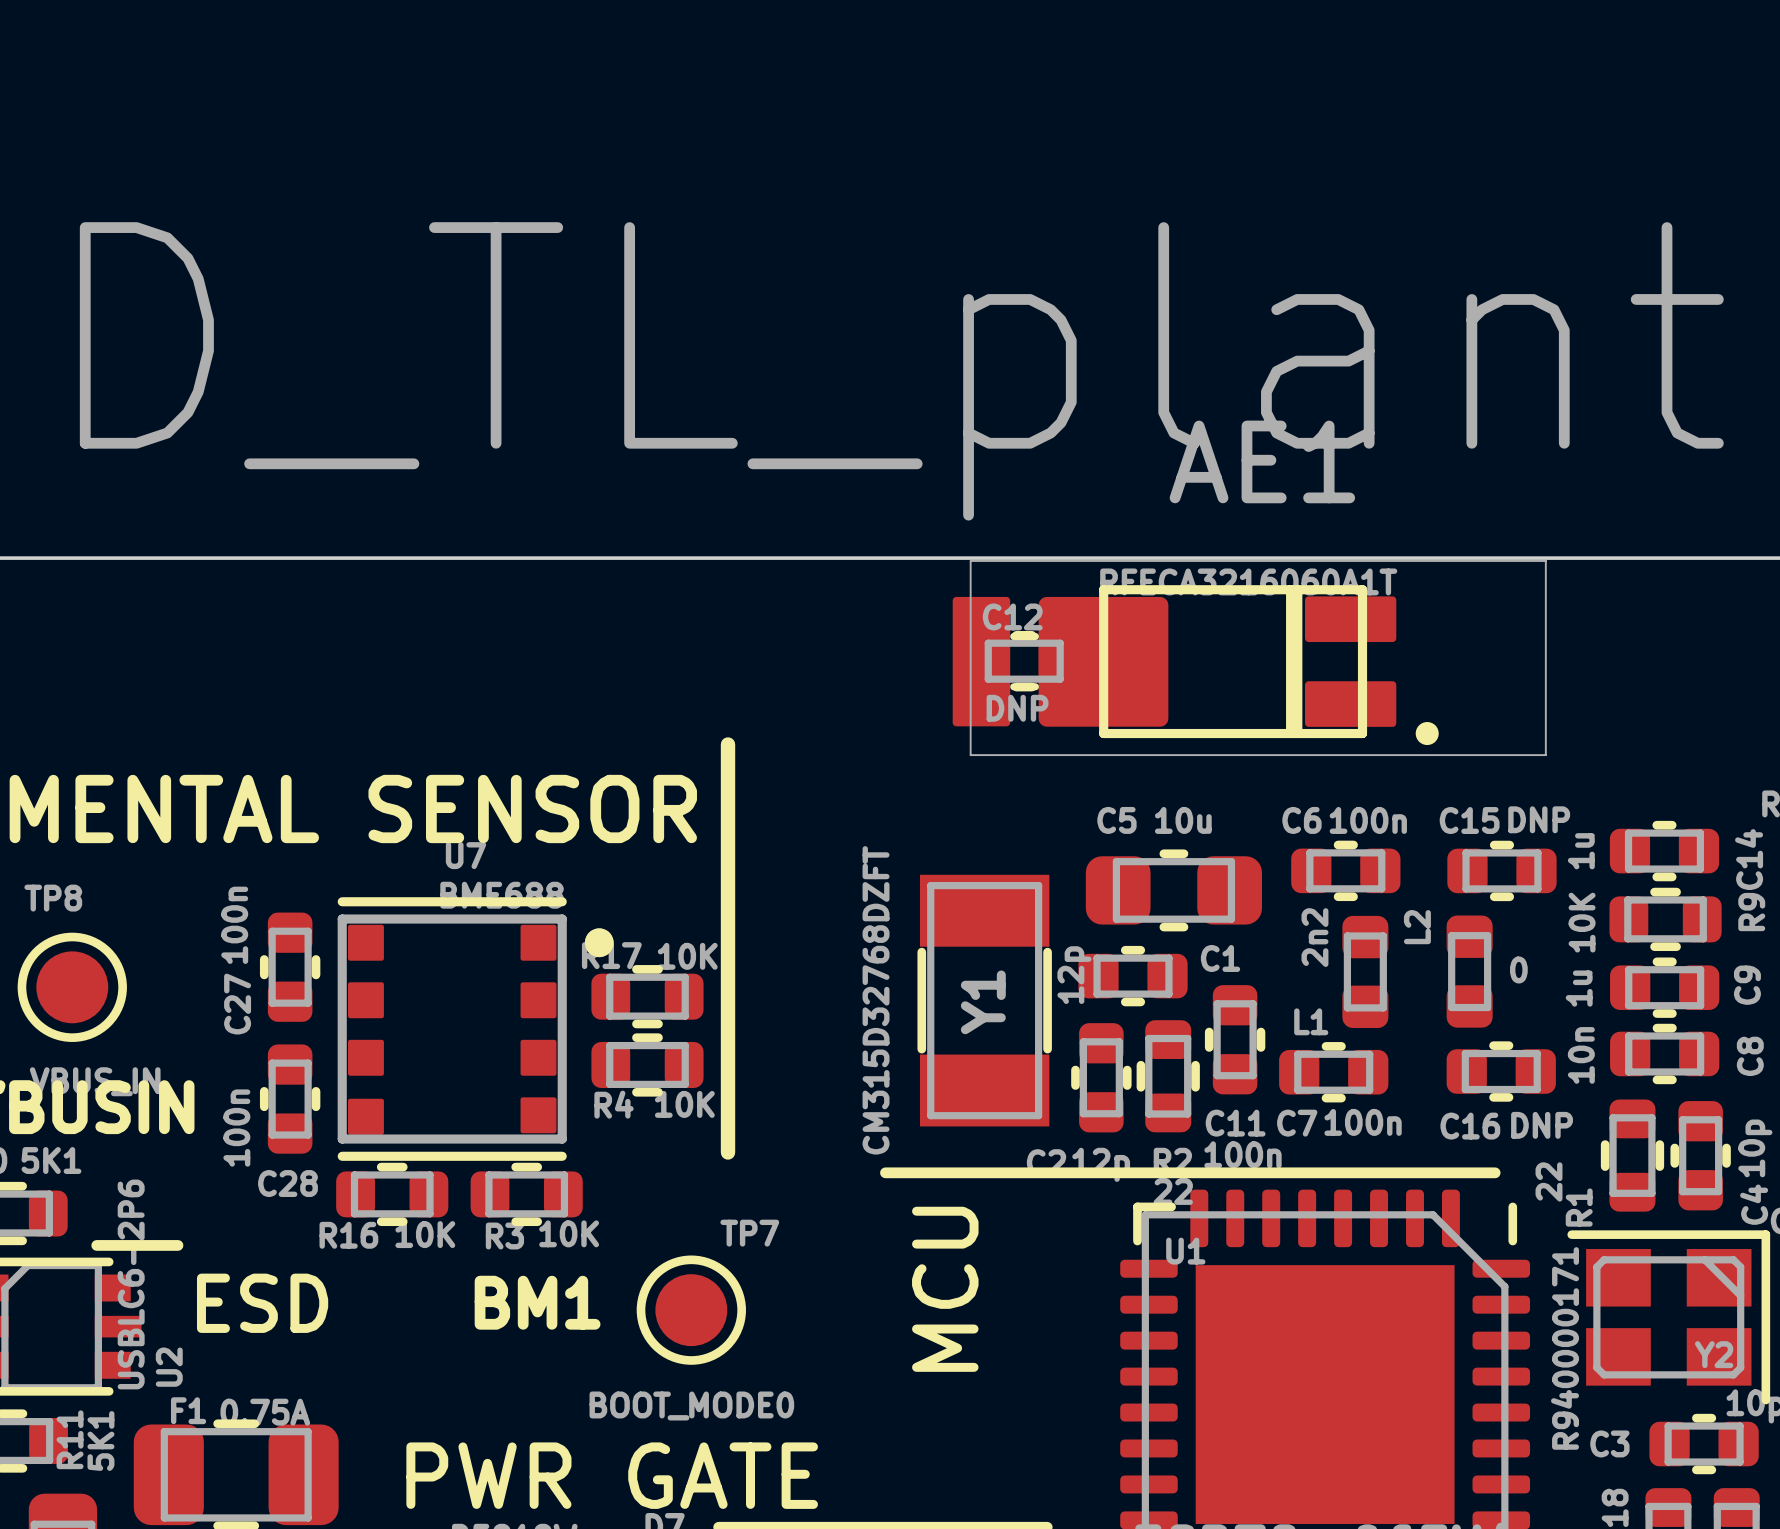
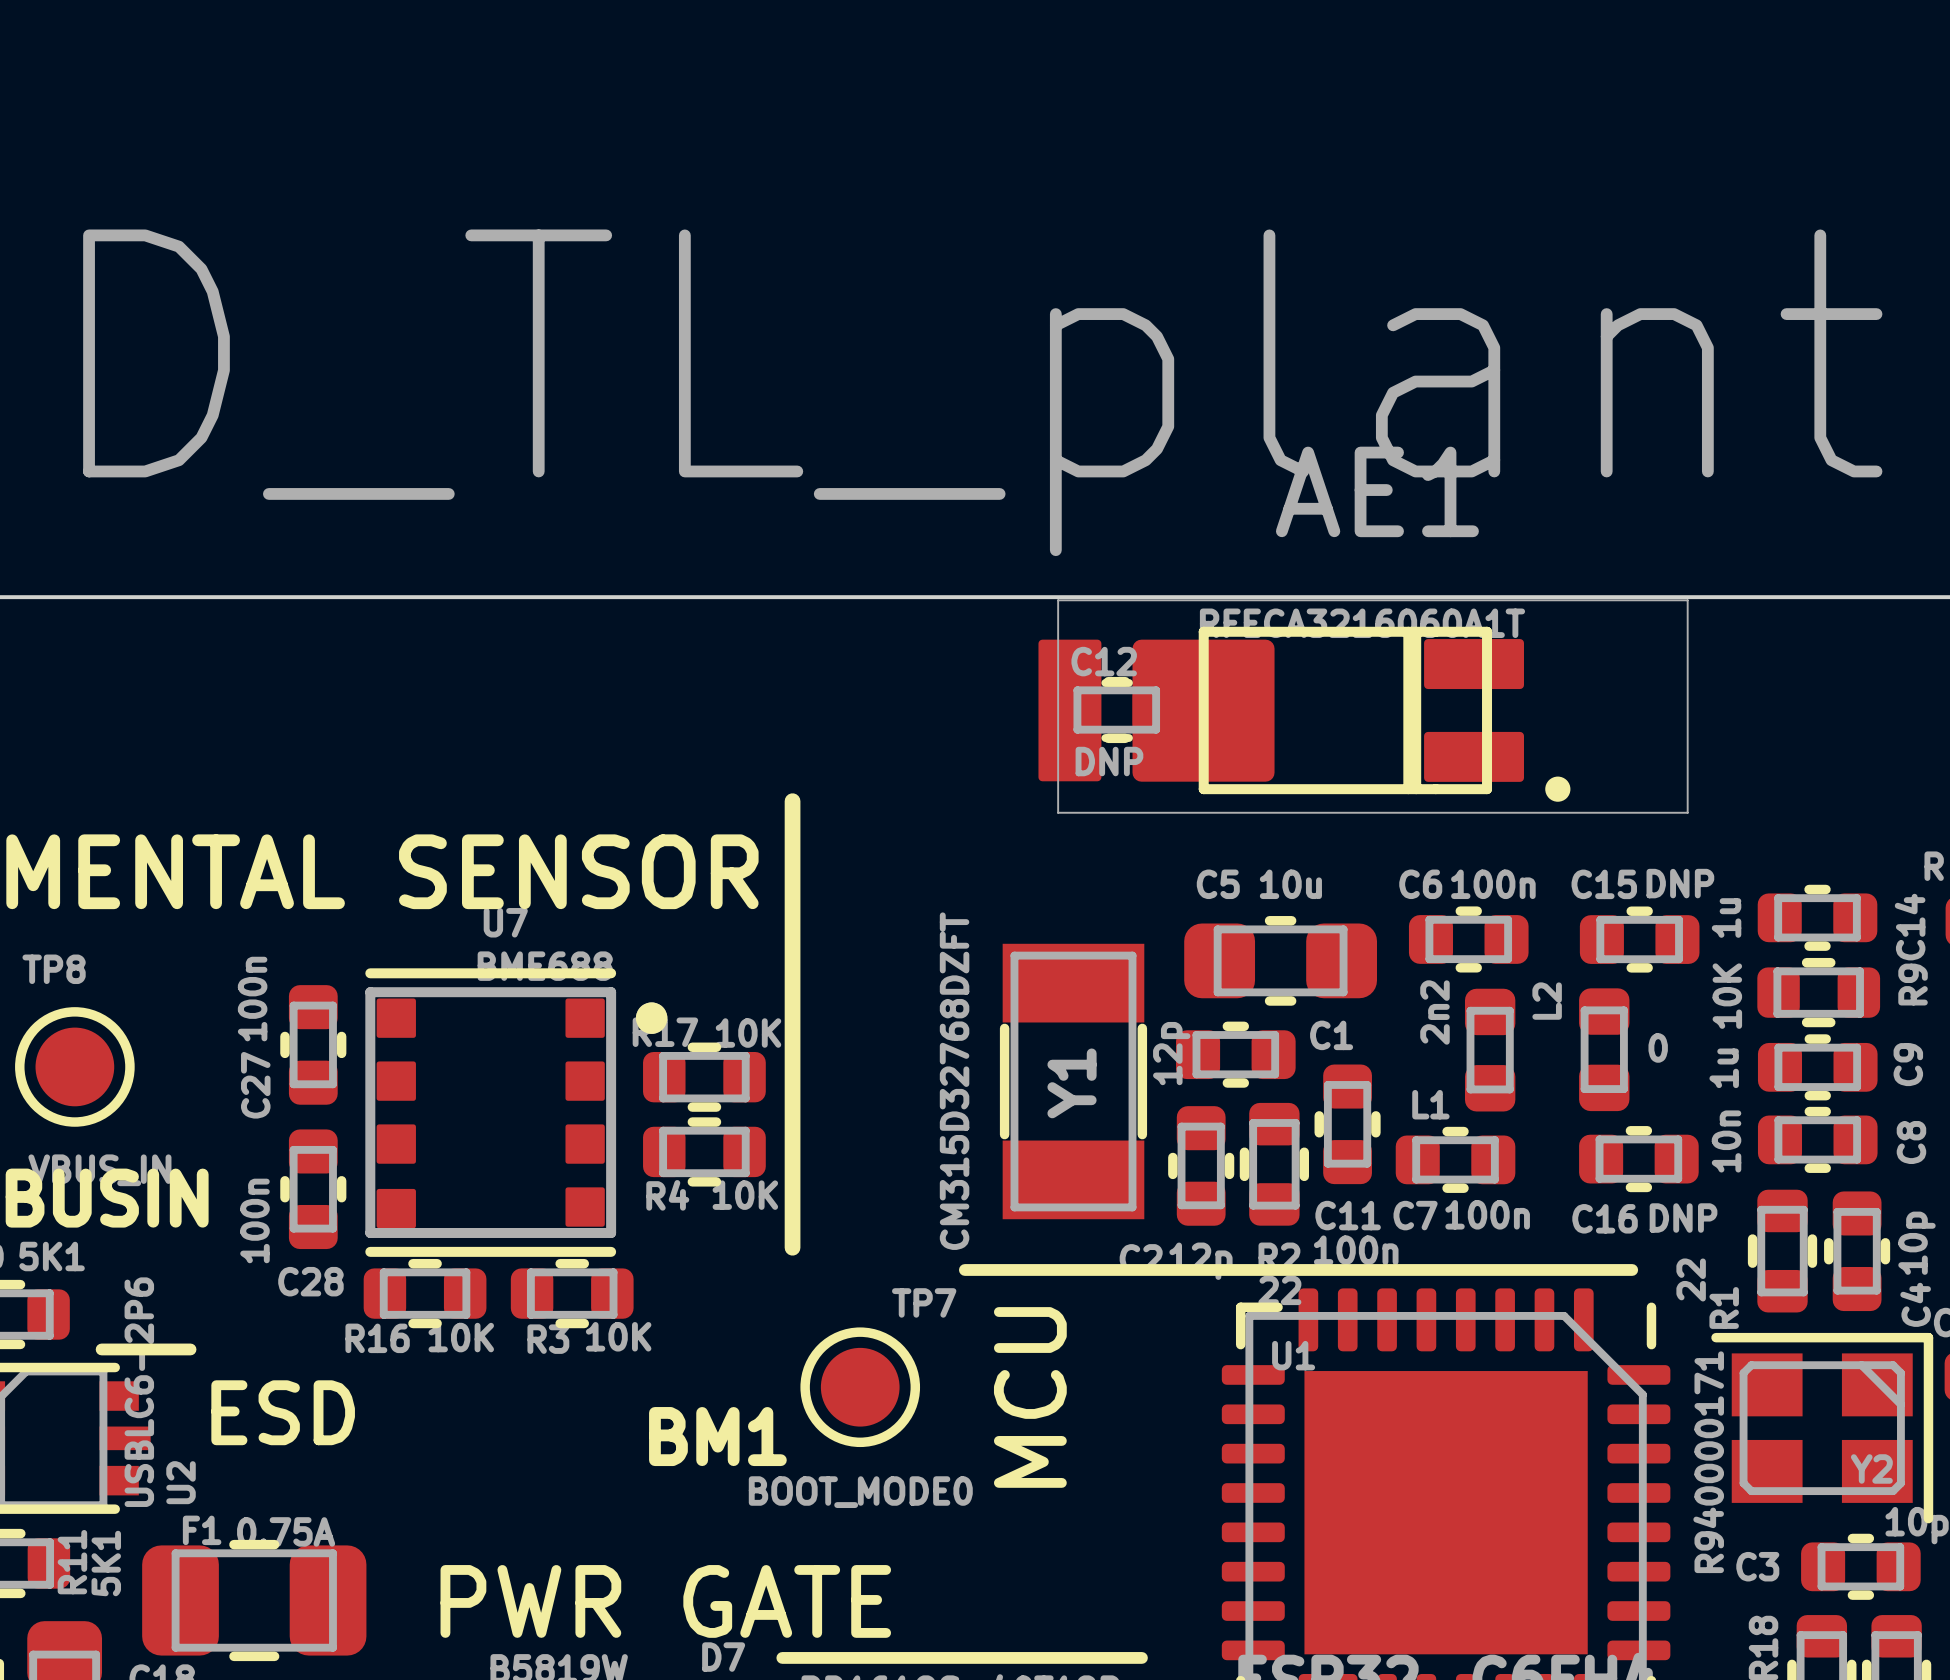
text position: BM1 (537, 1302) -> BM1 (717, 1436)
TP7 position: (691, 1310) -> (860, 1387)

